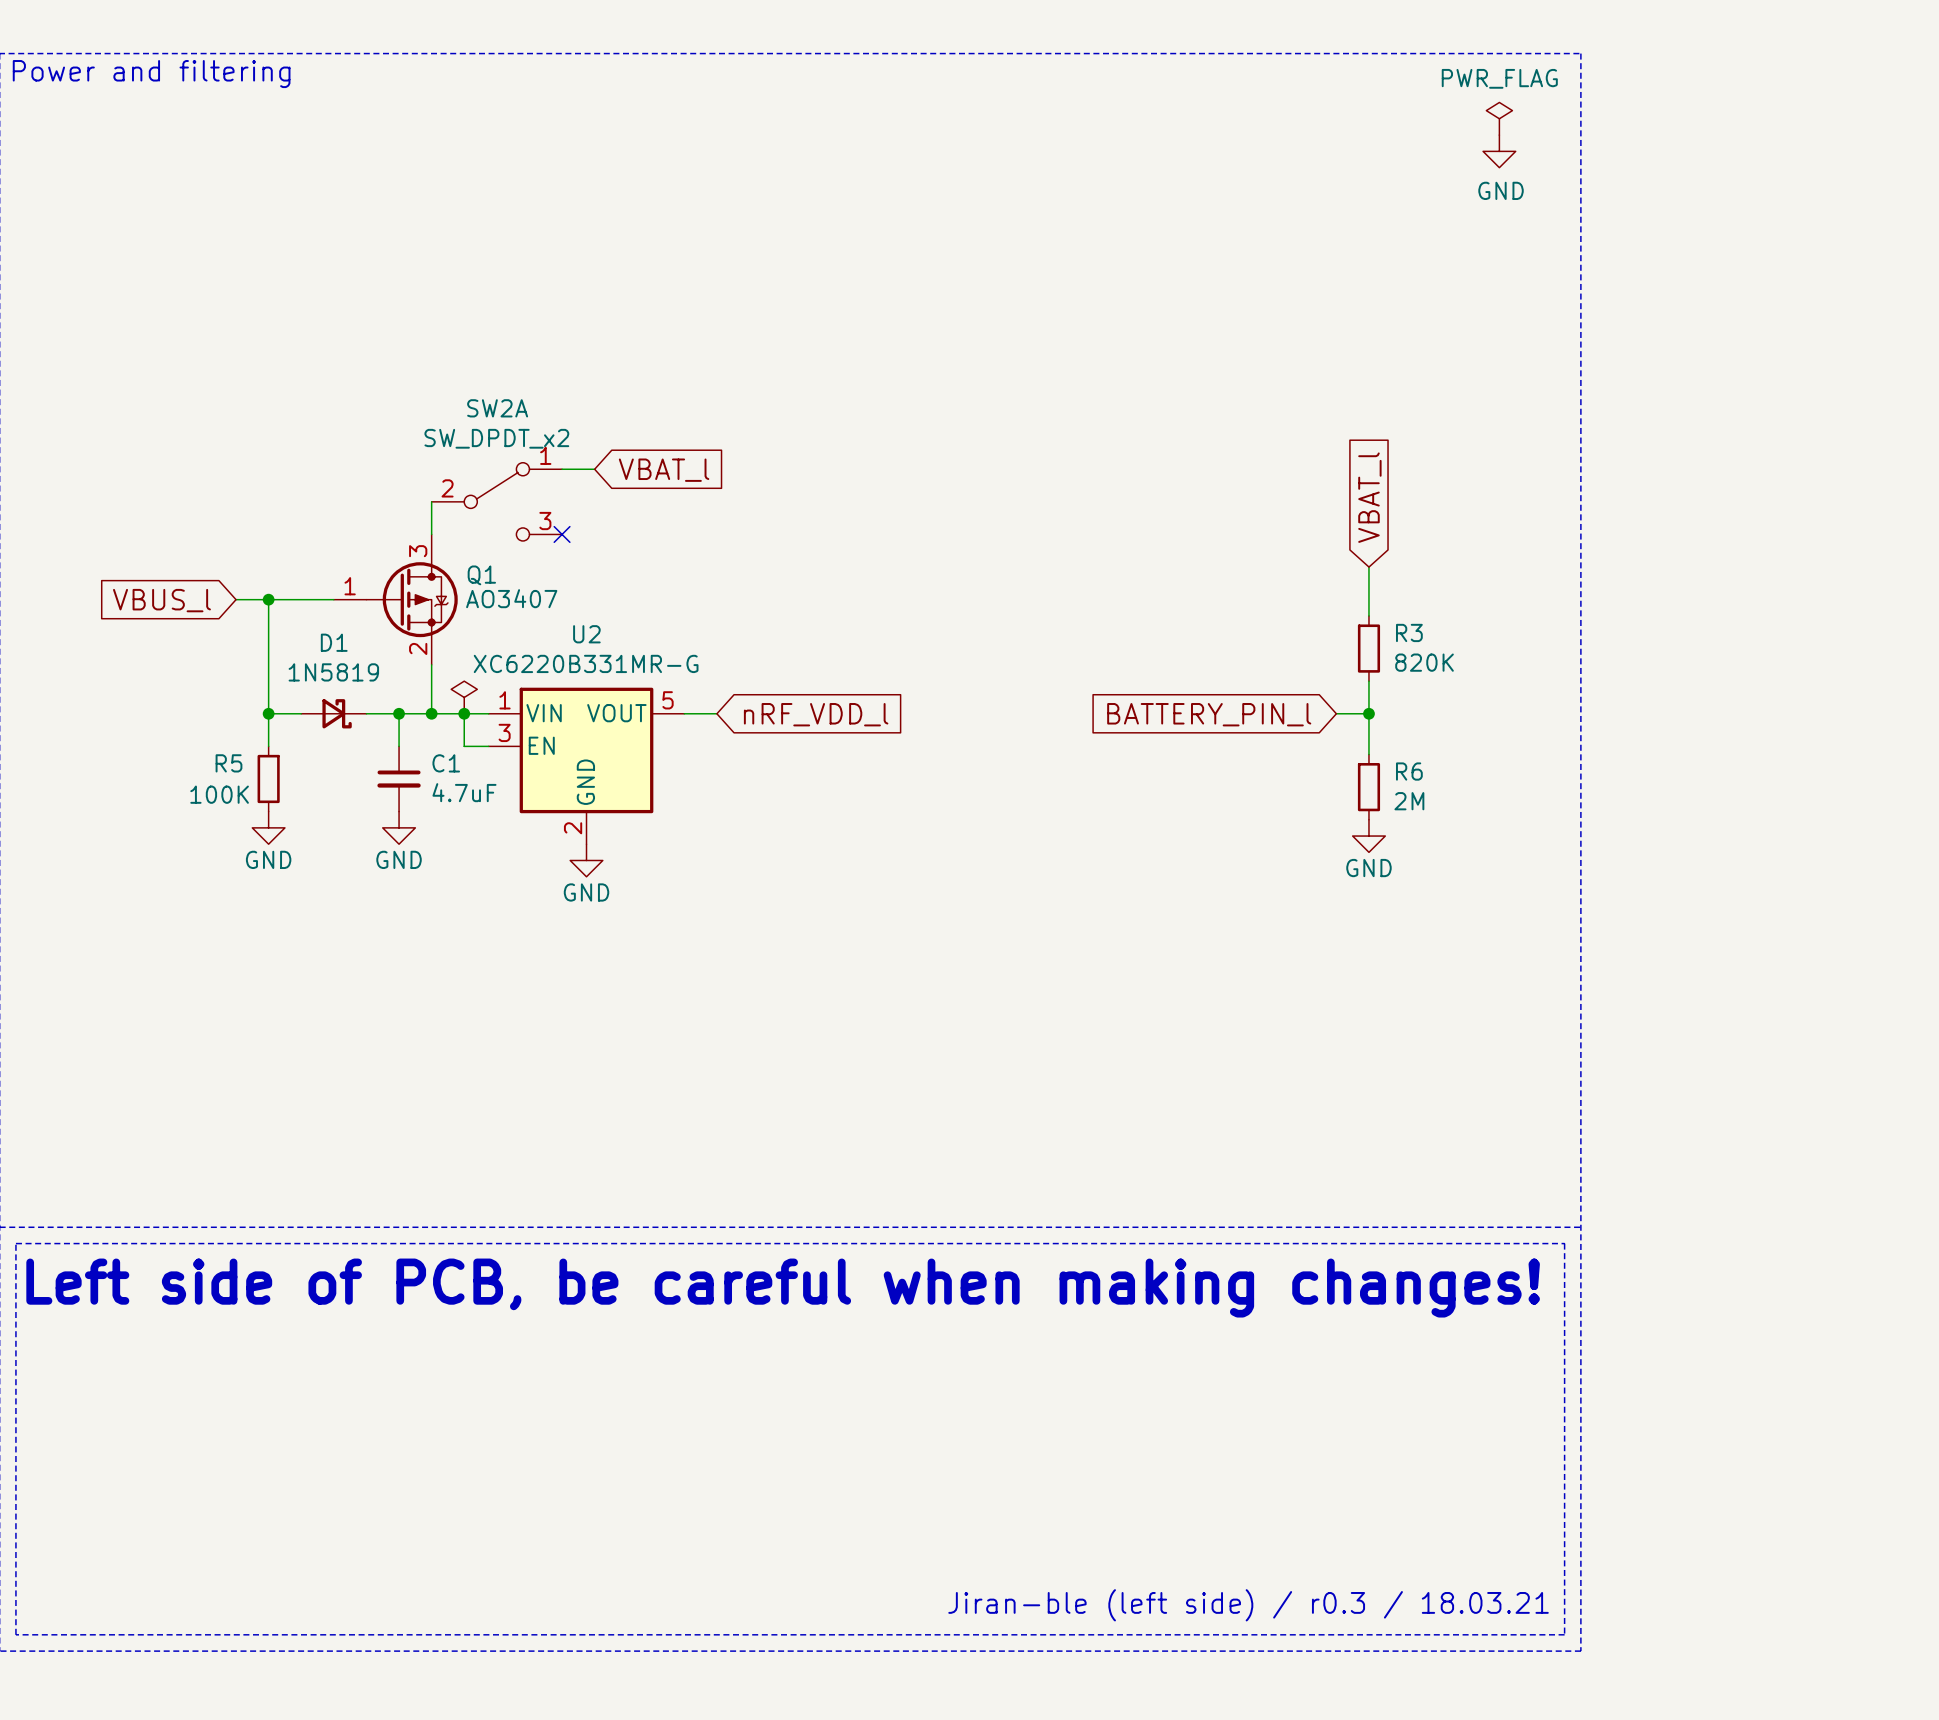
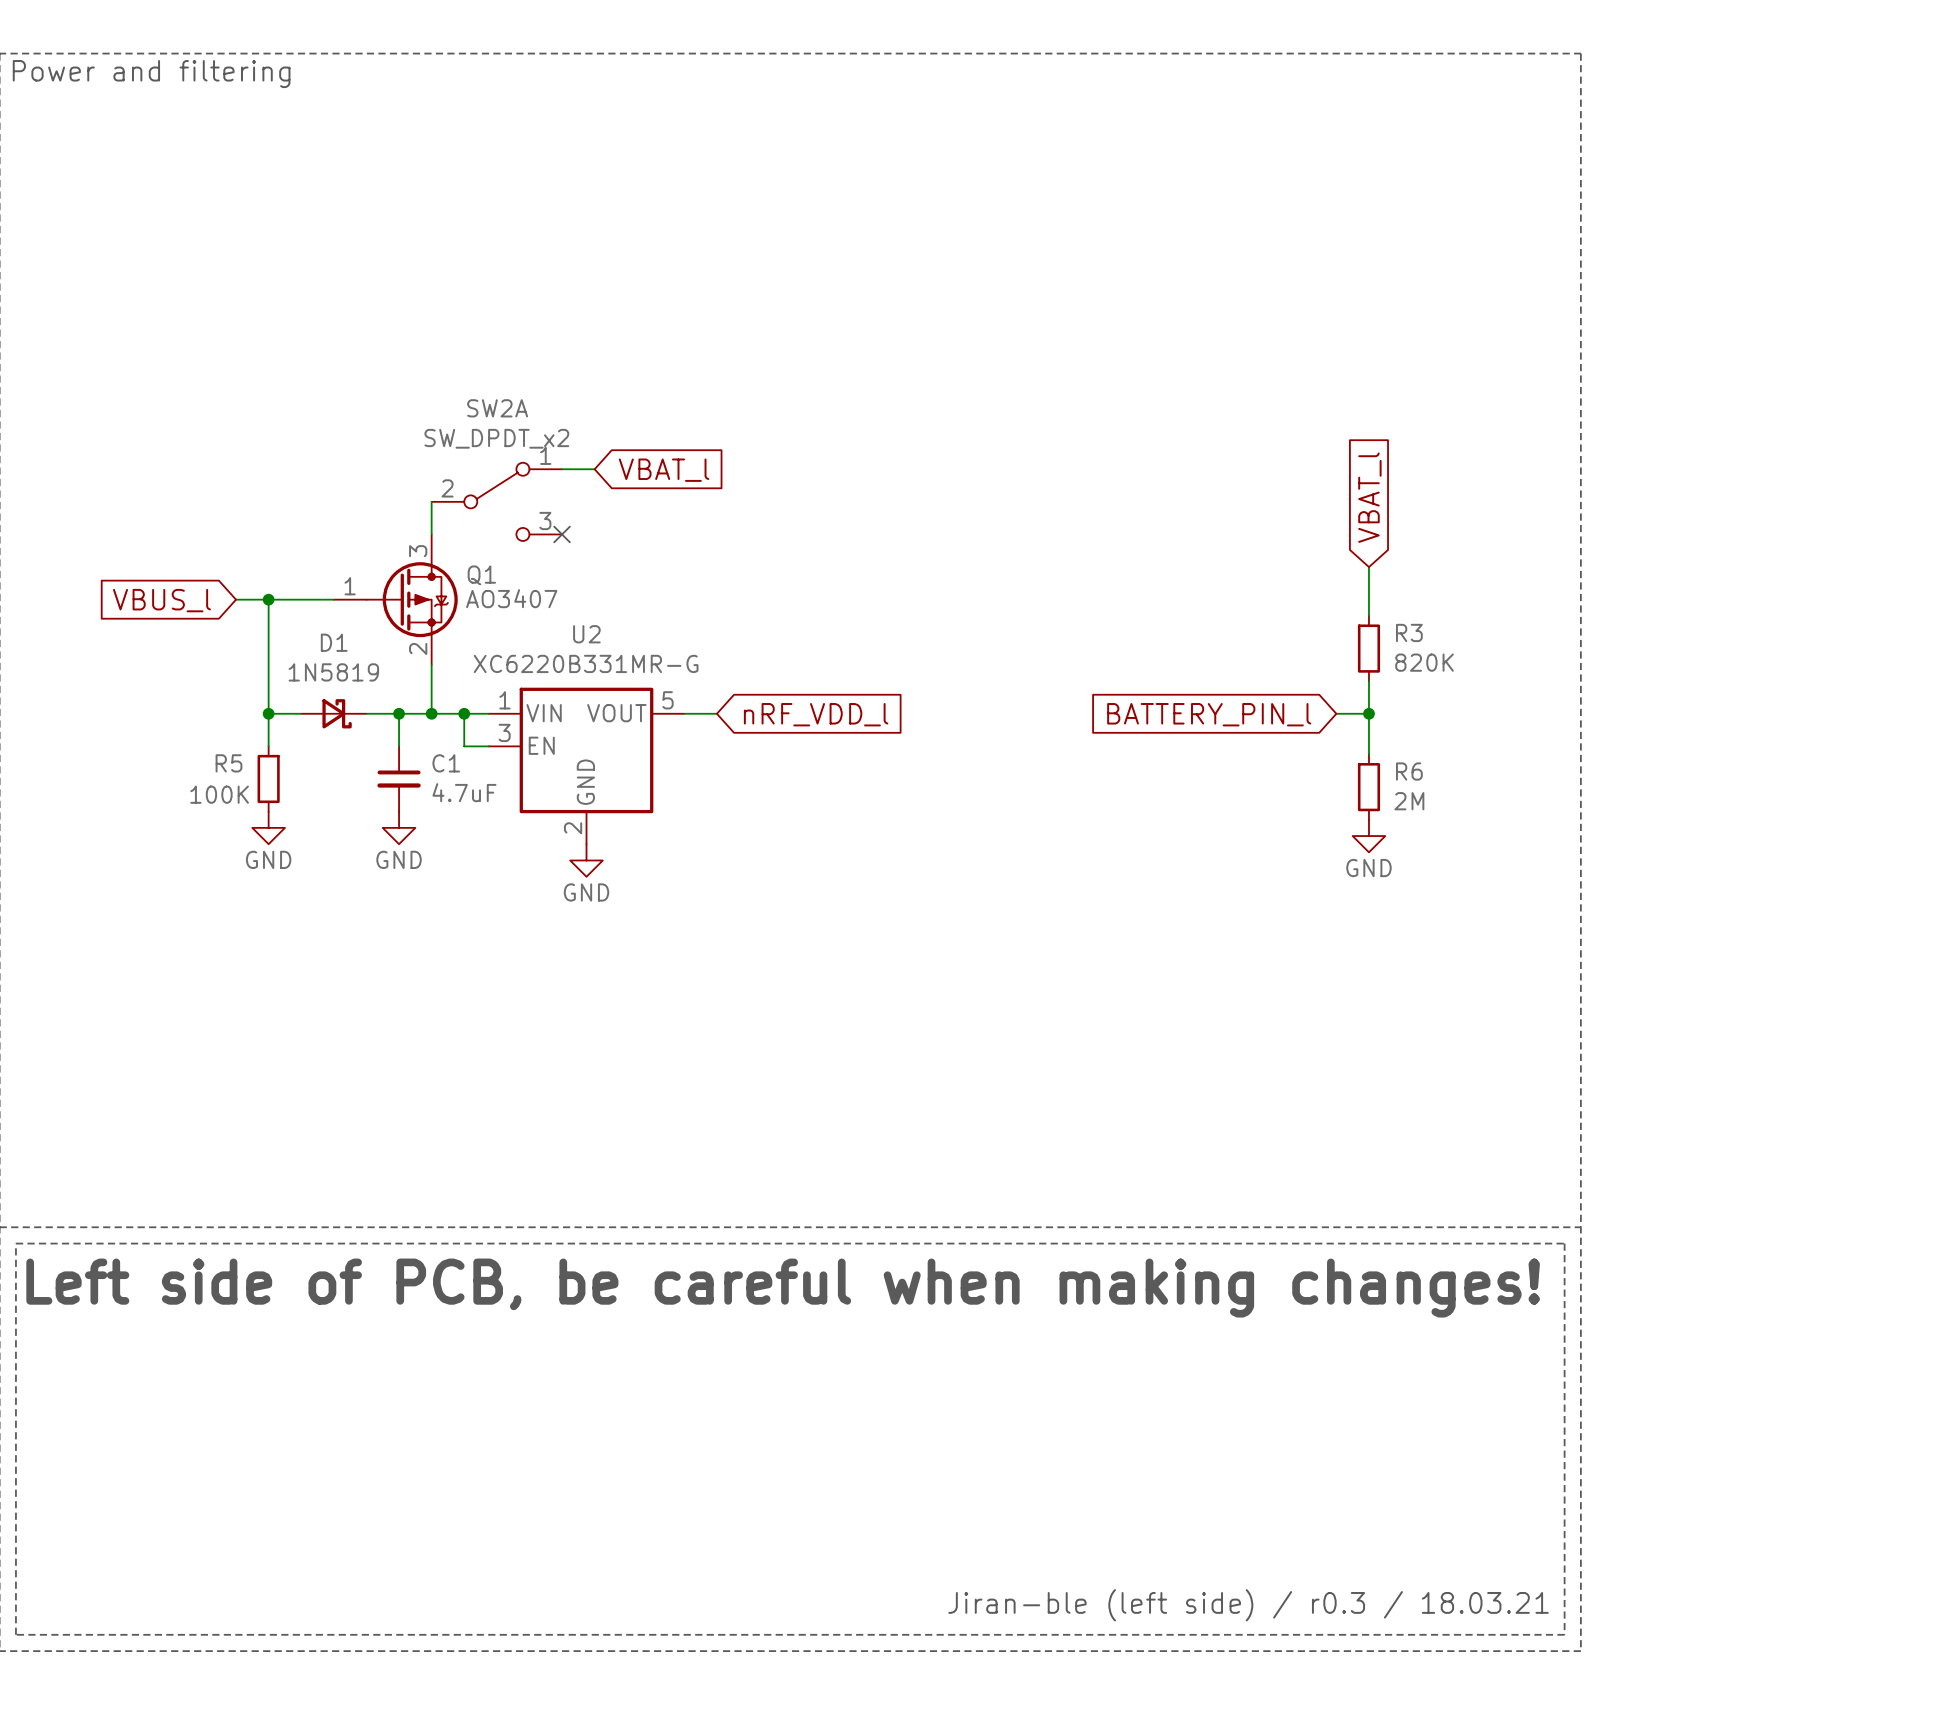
power symbol: PWR_FLAG (1499, 118) -> none
power symbol: GND (1499, 151) -> none
power symbol: (464, 697) -> none

